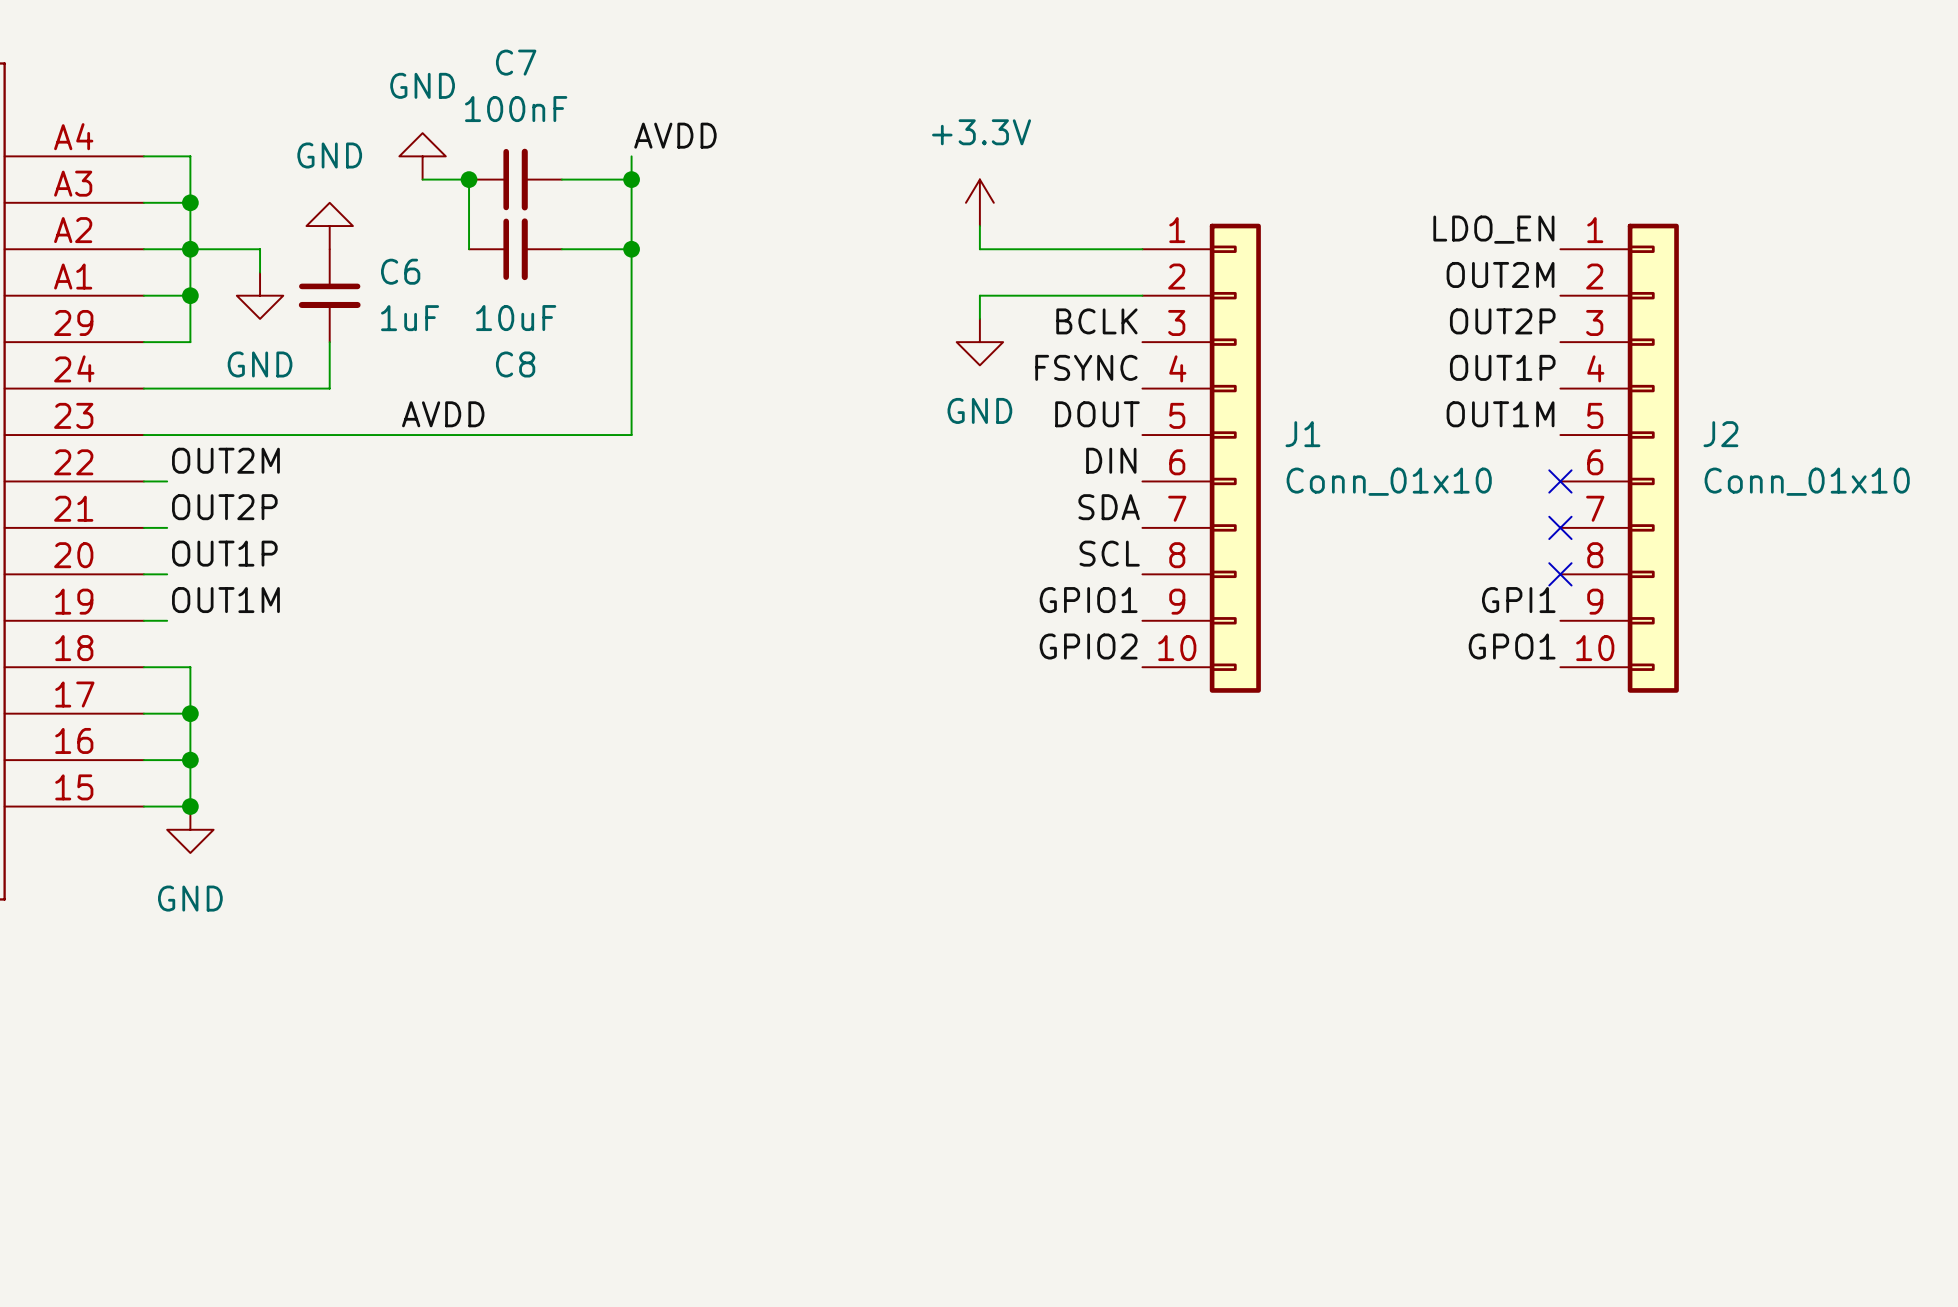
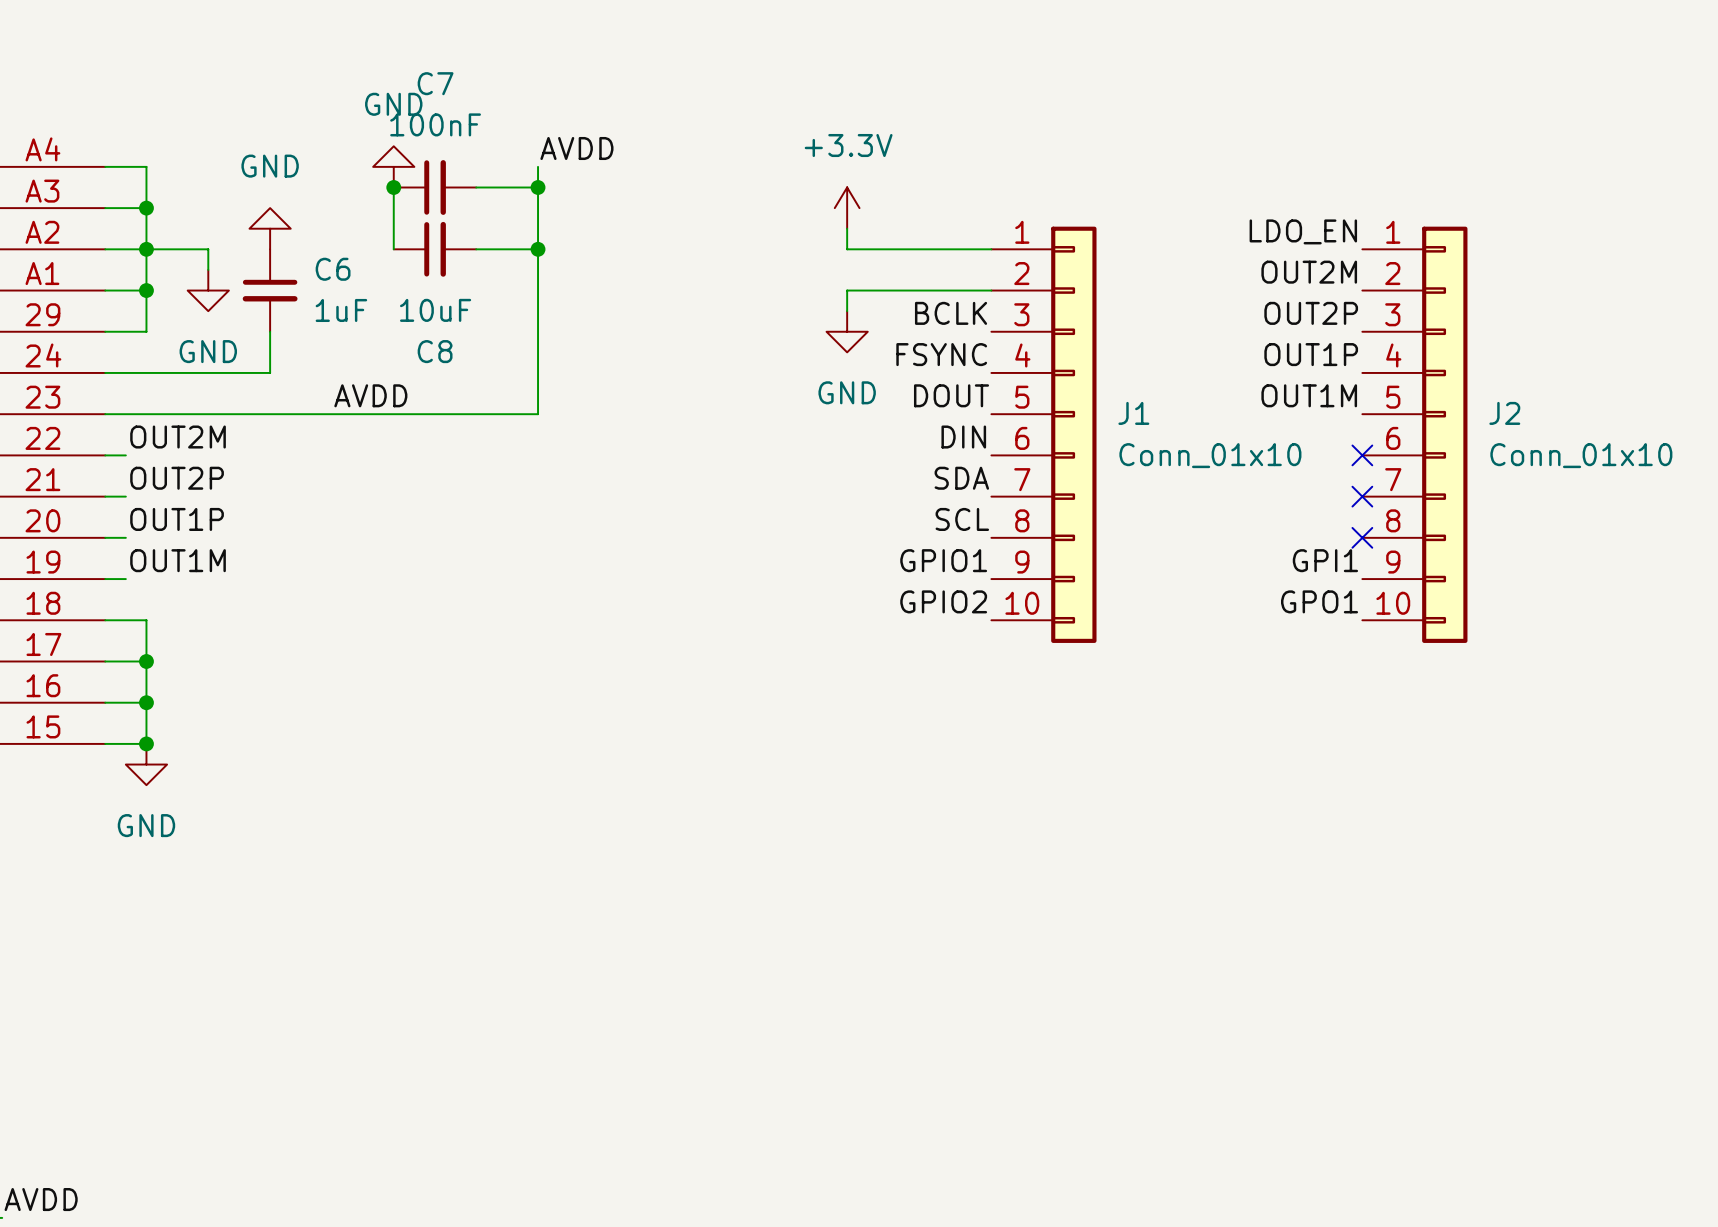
power symbol position: GND (422, 156) -> GND (393, 166)
wire: (422, 179) (469, 179) -> none

